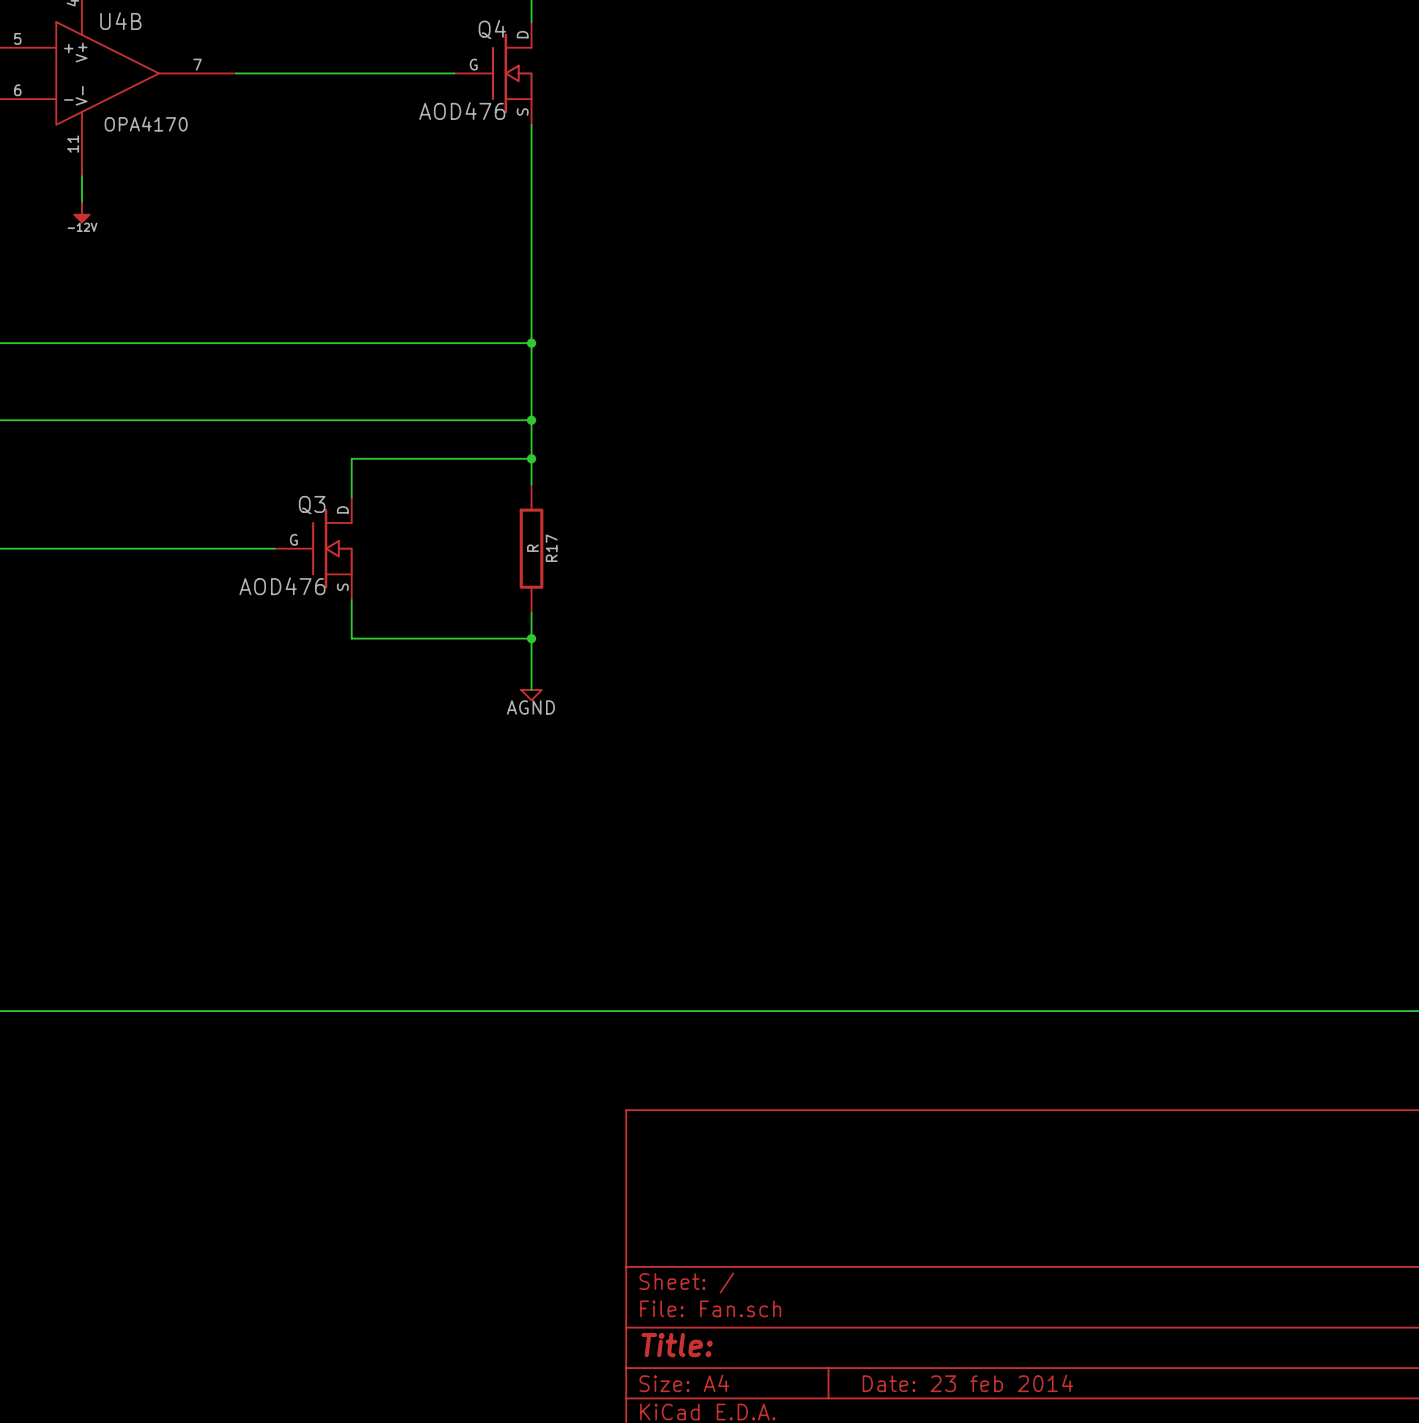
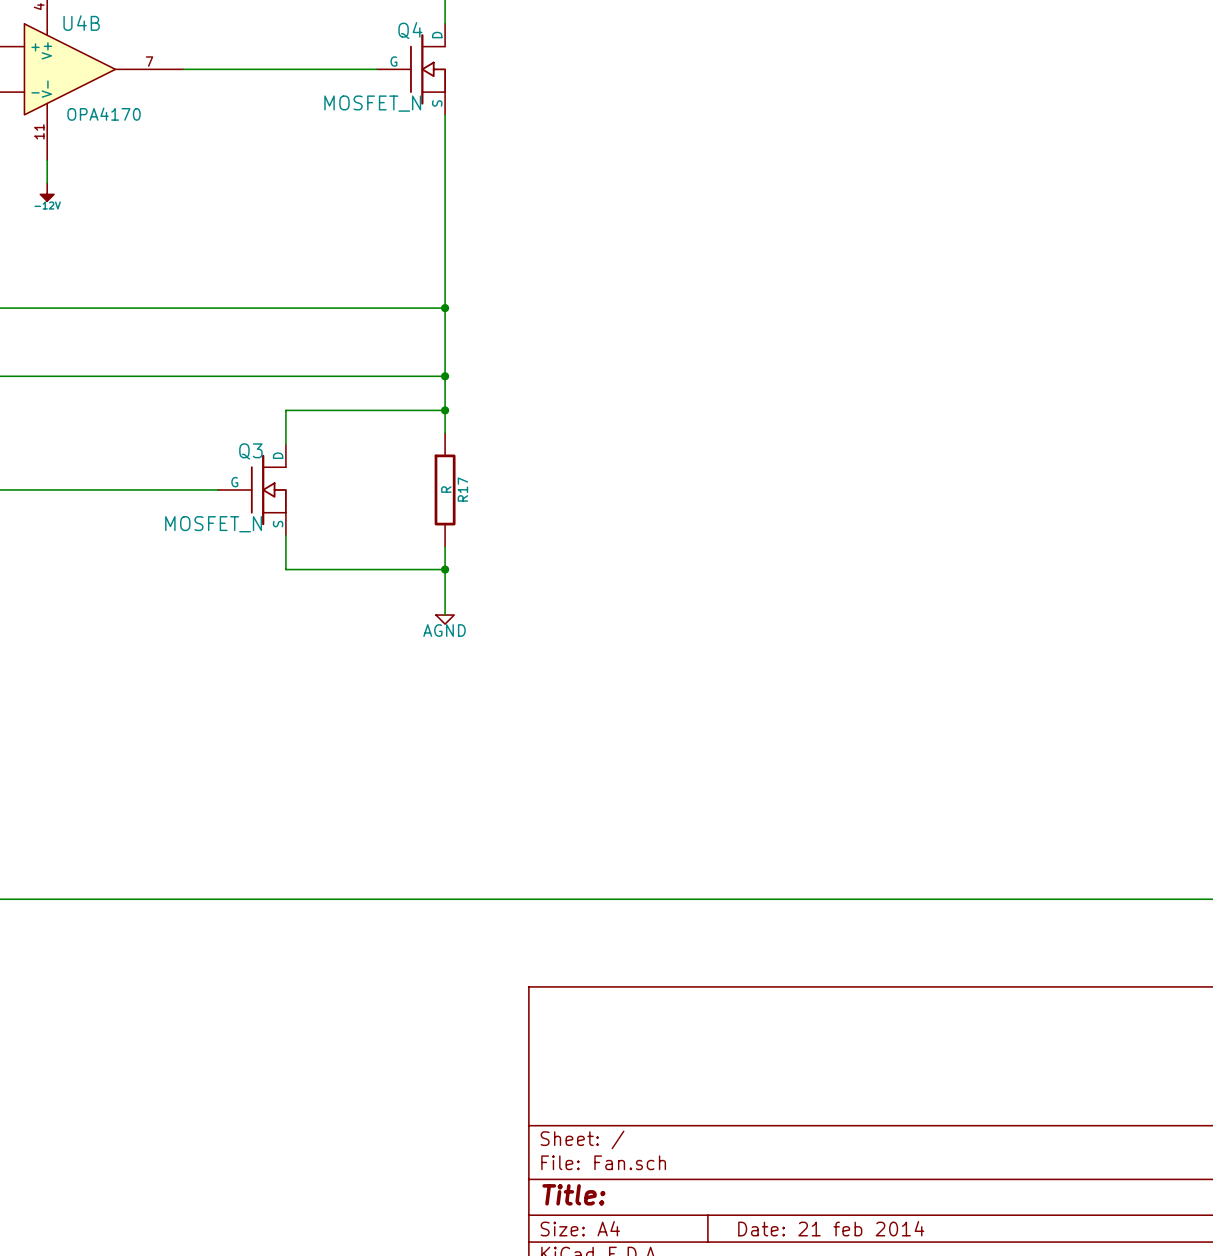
Q4 value: AOD476 (462, 111) -> MOSFET_N (372, 103)
Q3 value: AOD476 (282, 586) -> MOSFET_N (213, 524)
title block: Date: 23 feb 2014 (967, 1383) -> Date: 21 feb 2014 (831, 1228)

